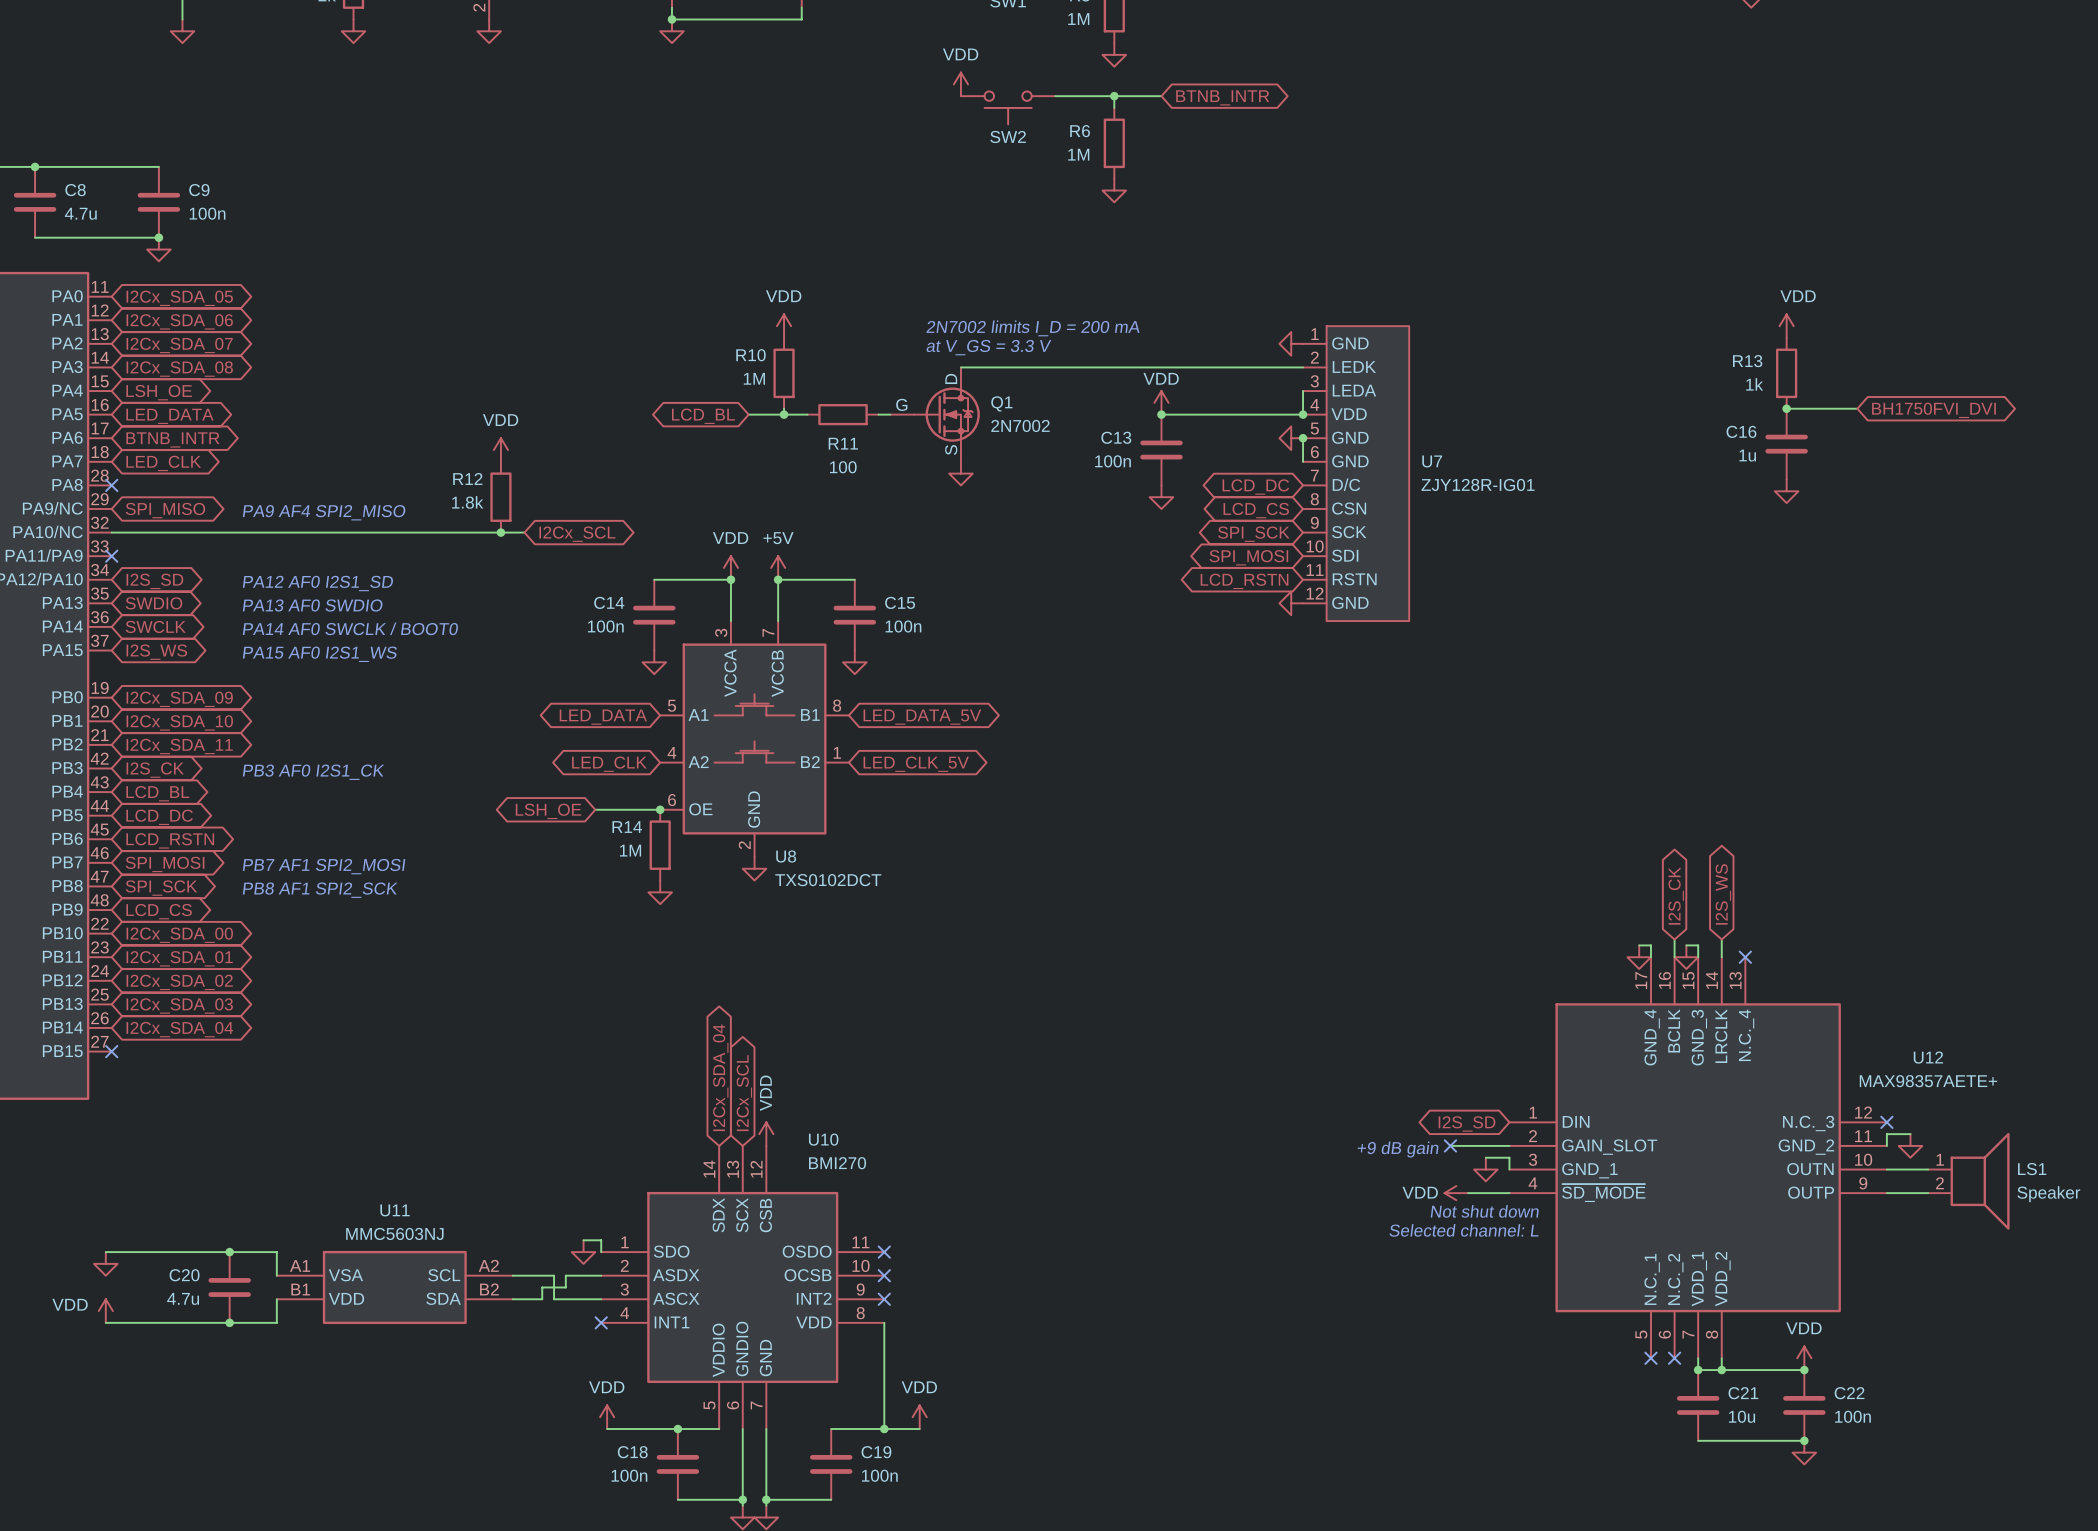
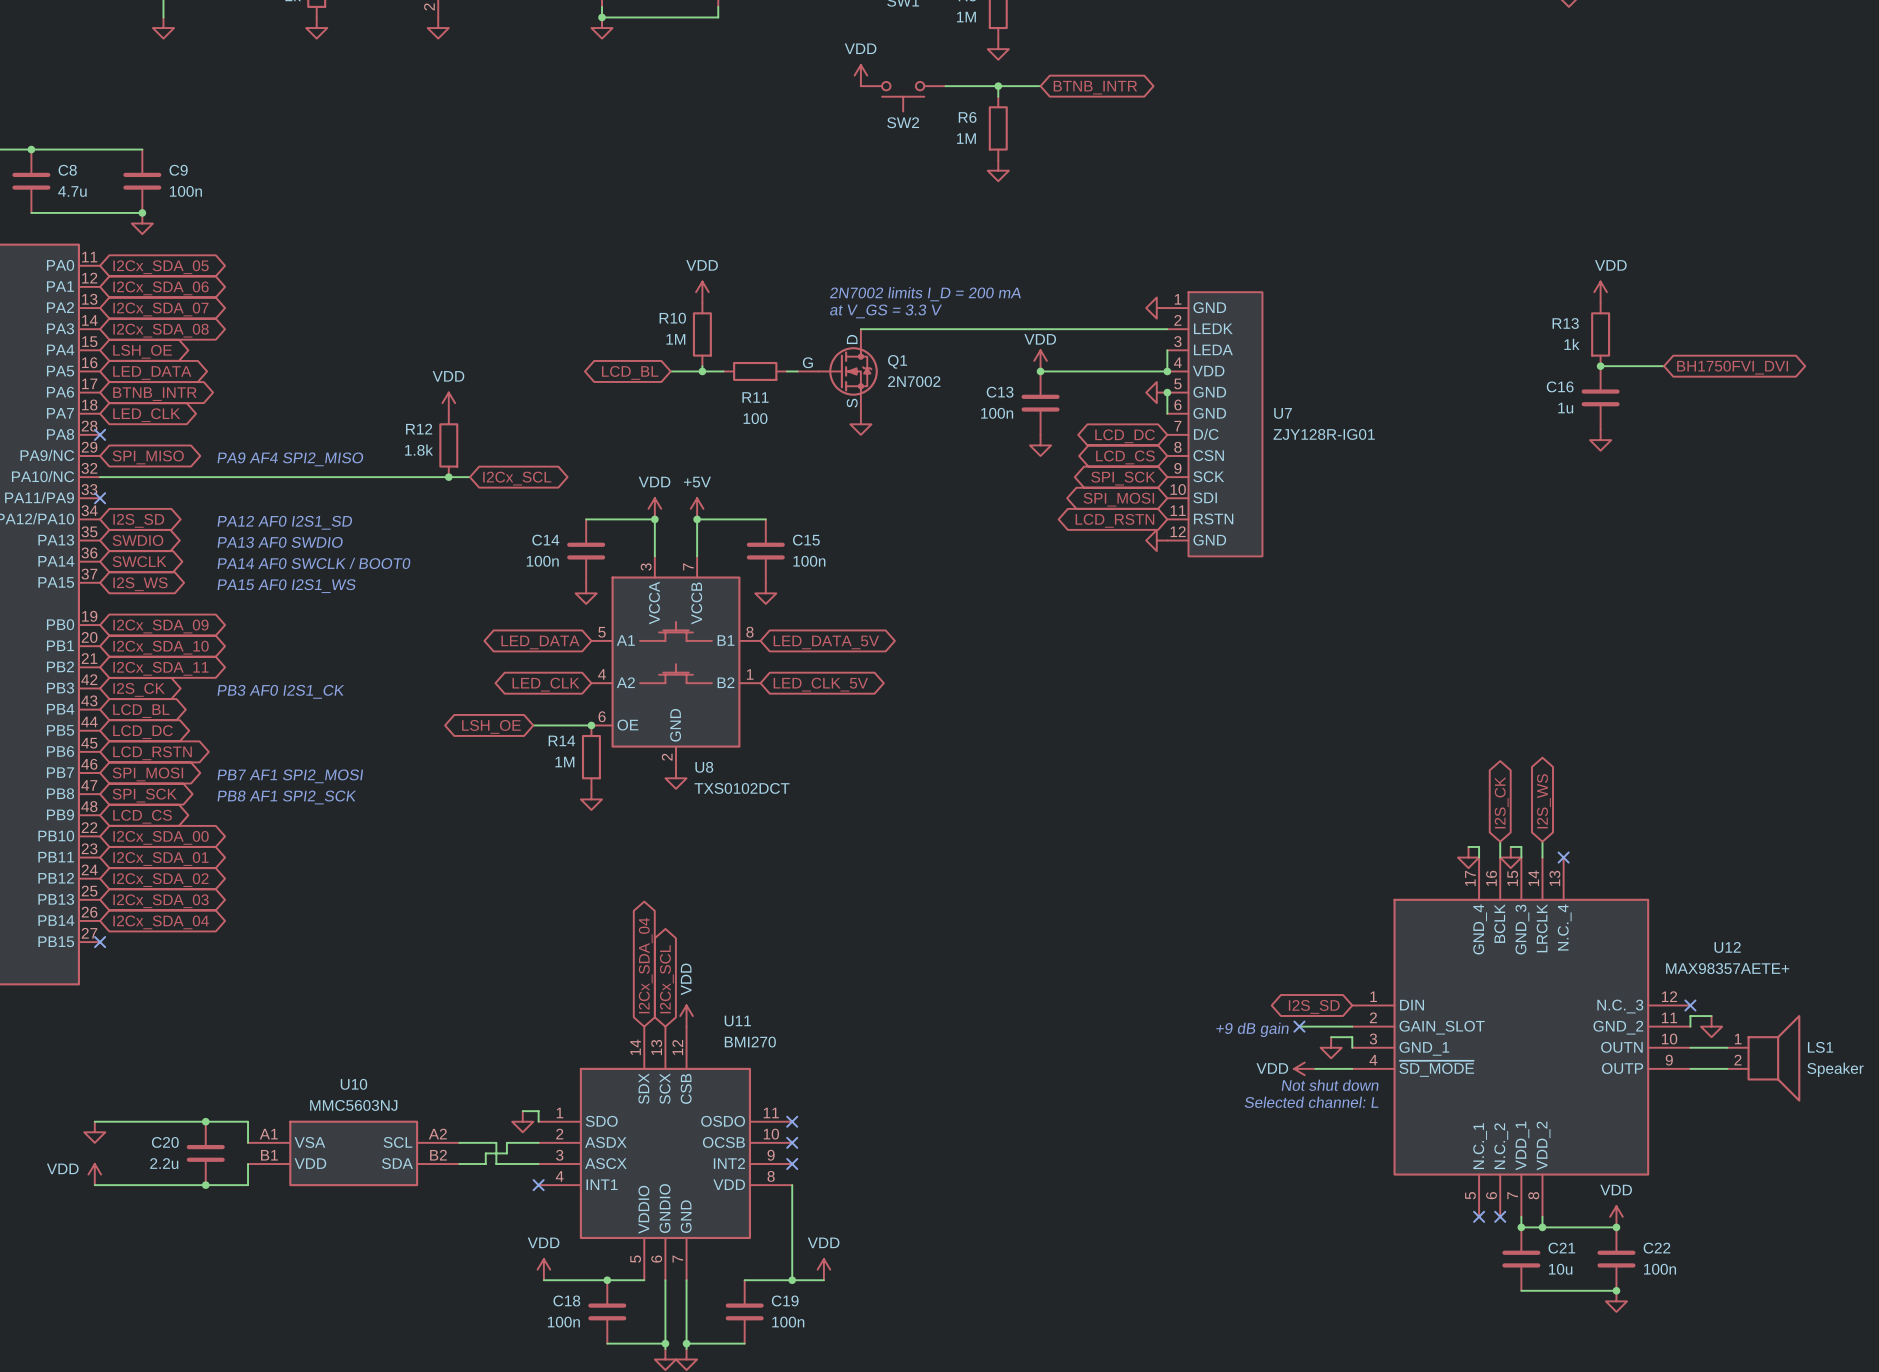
U10 name: U10 (823, 1139) -> U11 (737, 1021)
U11 name: U11 (395, 1210) -> U10 (353, 1084)
C20 value: 4.7u (183, 1298) -> 2.2u (164, 1163)

